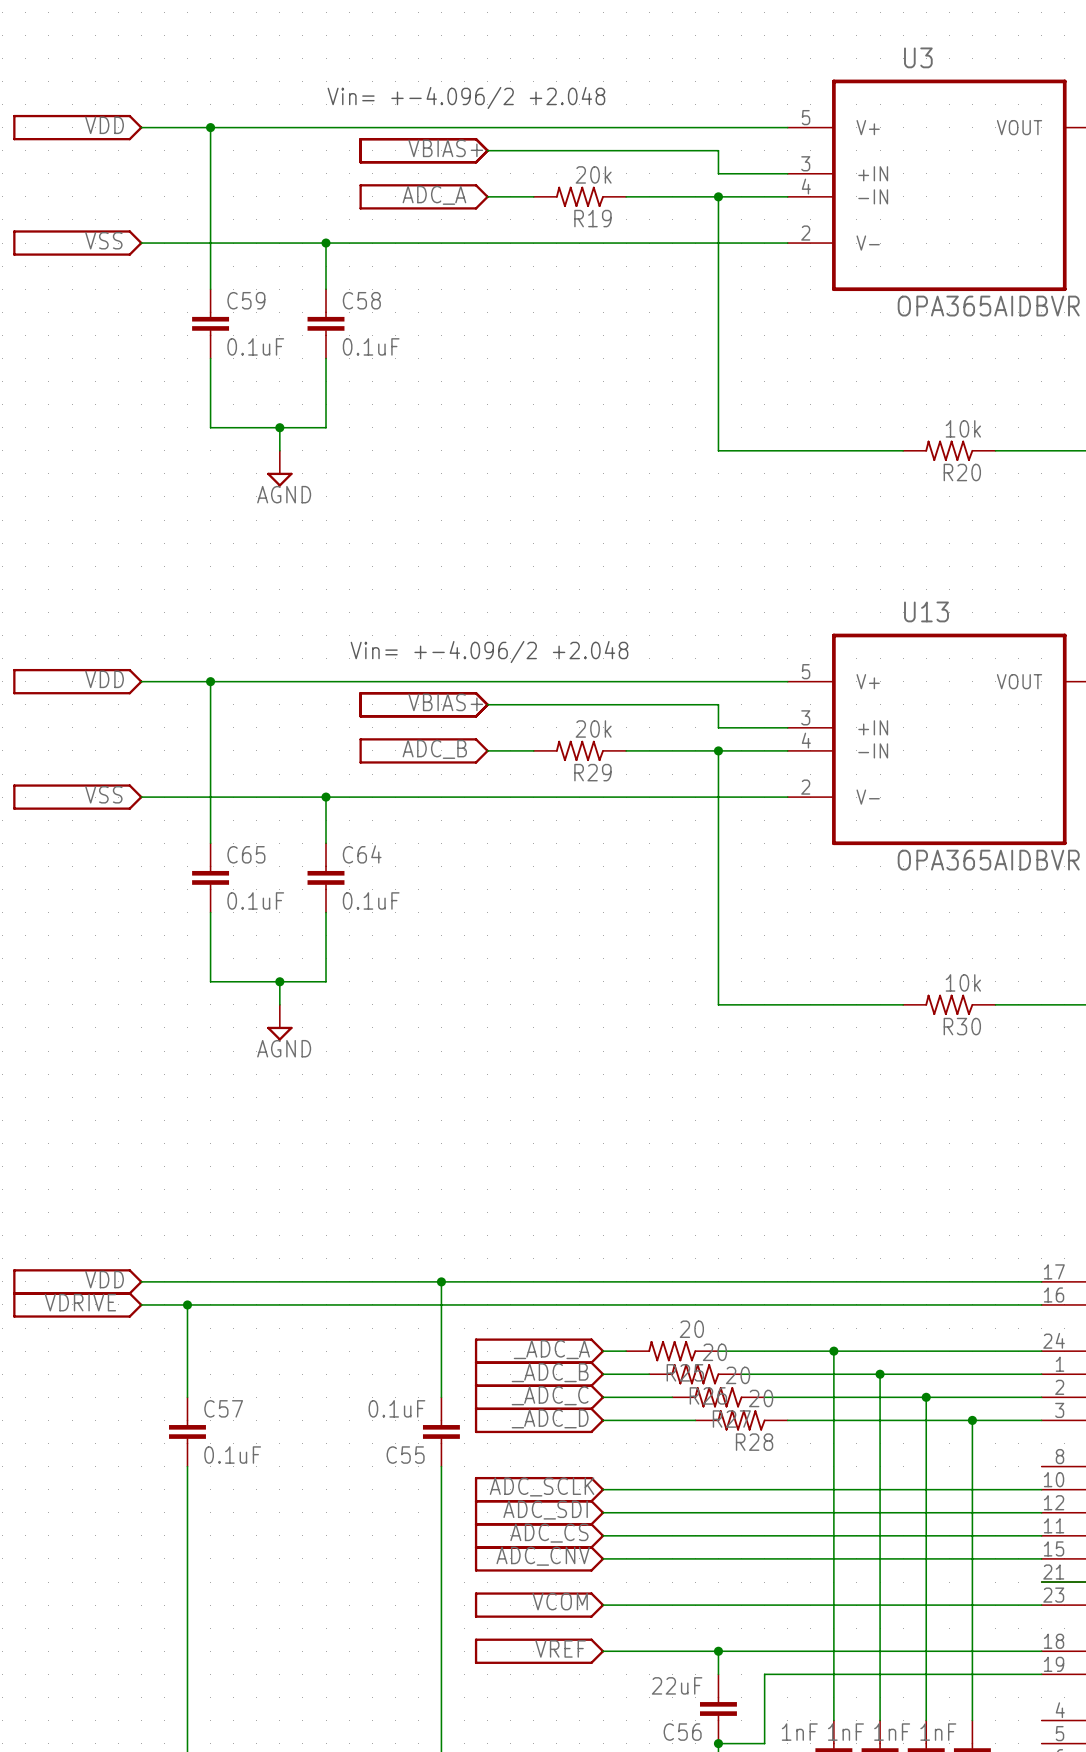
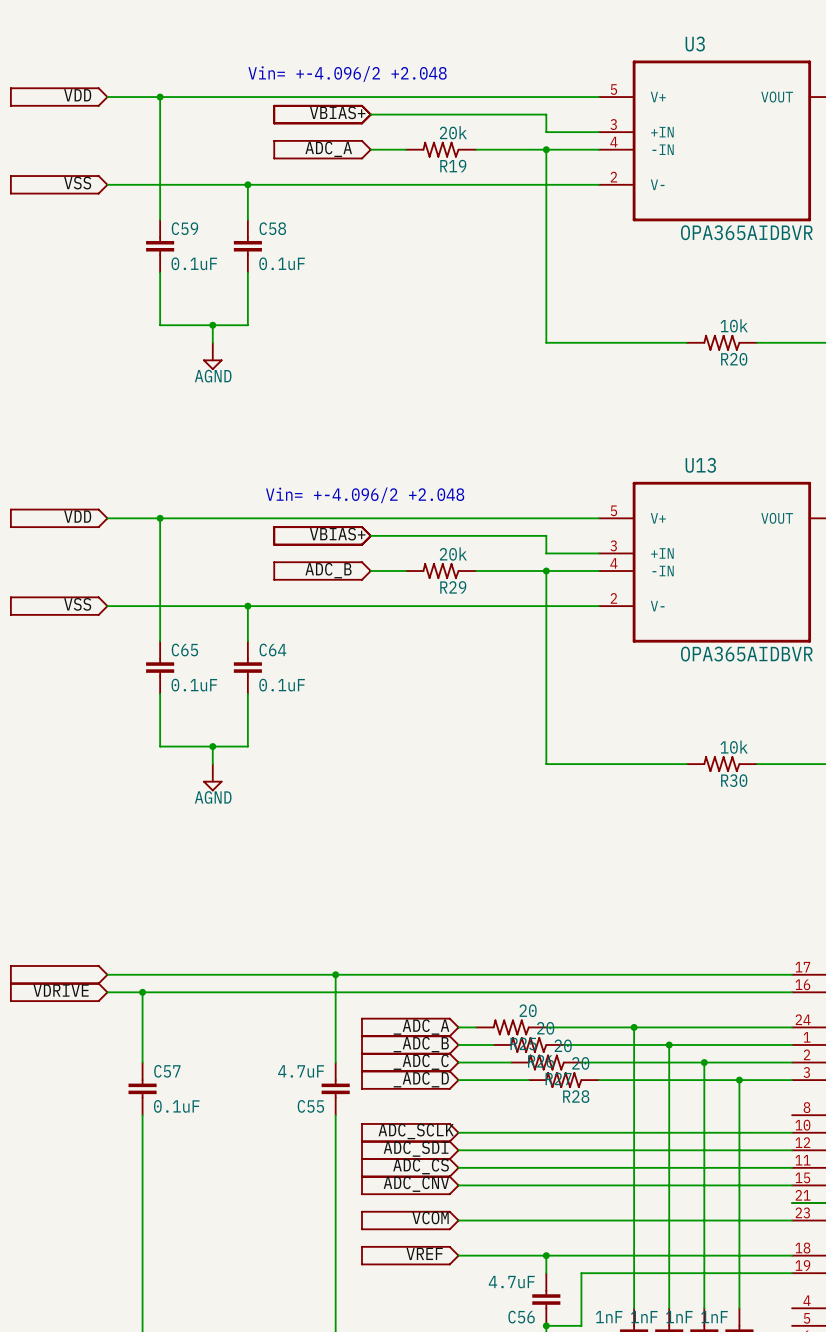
label: VDD (104, 1279) -> none
C55 value: 0.1uF (396, 1408) -> 4.7uF (301, 1071)
C56 value: 22uF (677, 1685) -> 4.7uF (511, 1282)

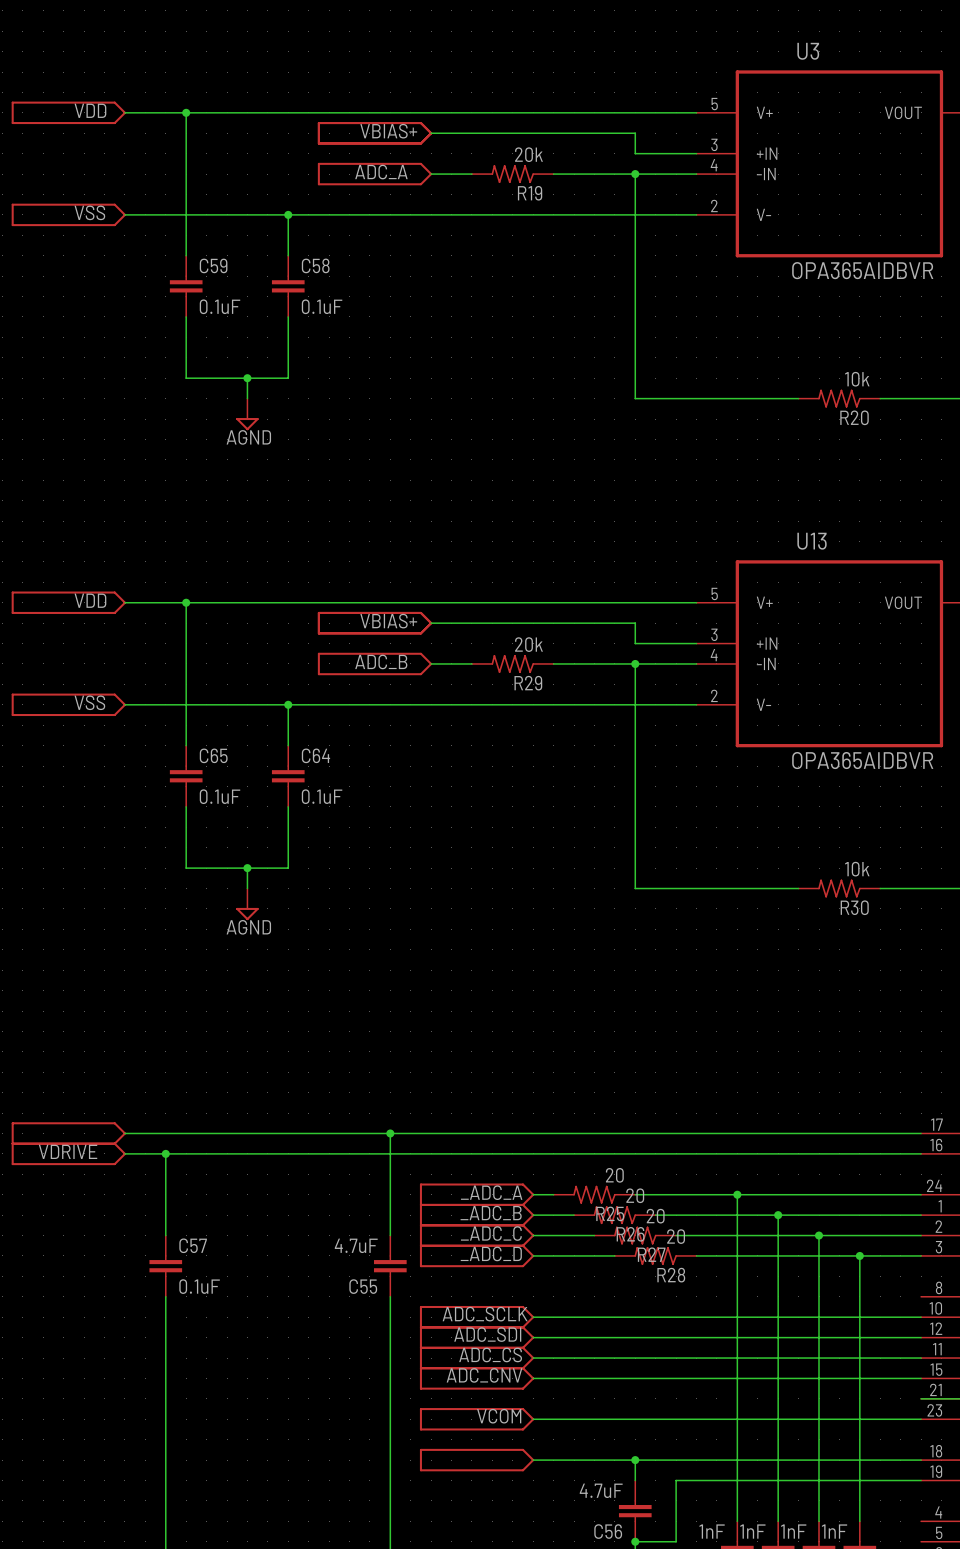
text: Vin= +-4.096/2 +2.048 (347, 74) -> none
text: Vin= +-4.096/2 +2.048 (365, 495) -> none
label: VREF (424, 1253) -> none

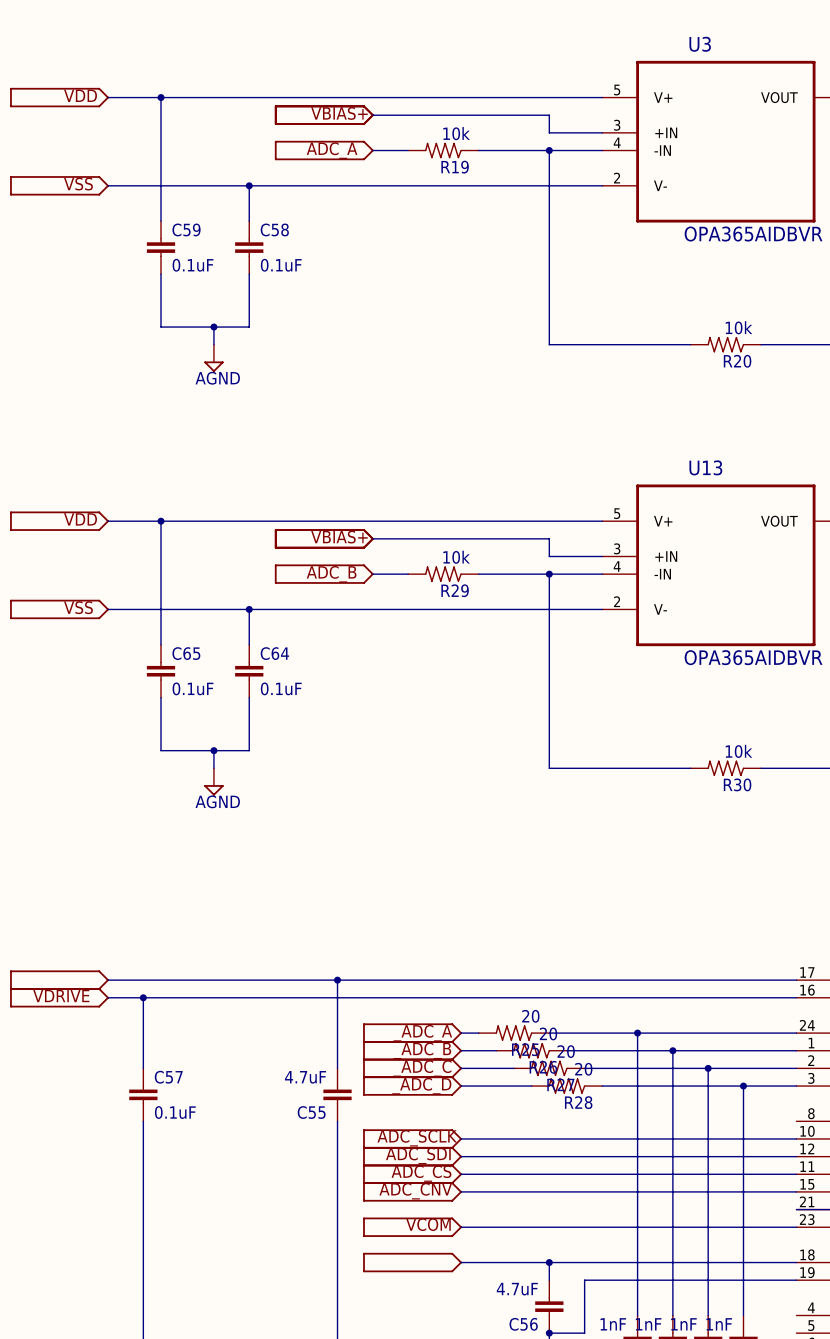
R19 value: 20k (528, 154) -> 10k (456, 133)
R29 value: 20k (528, 644) -> 10k (456, 557)

